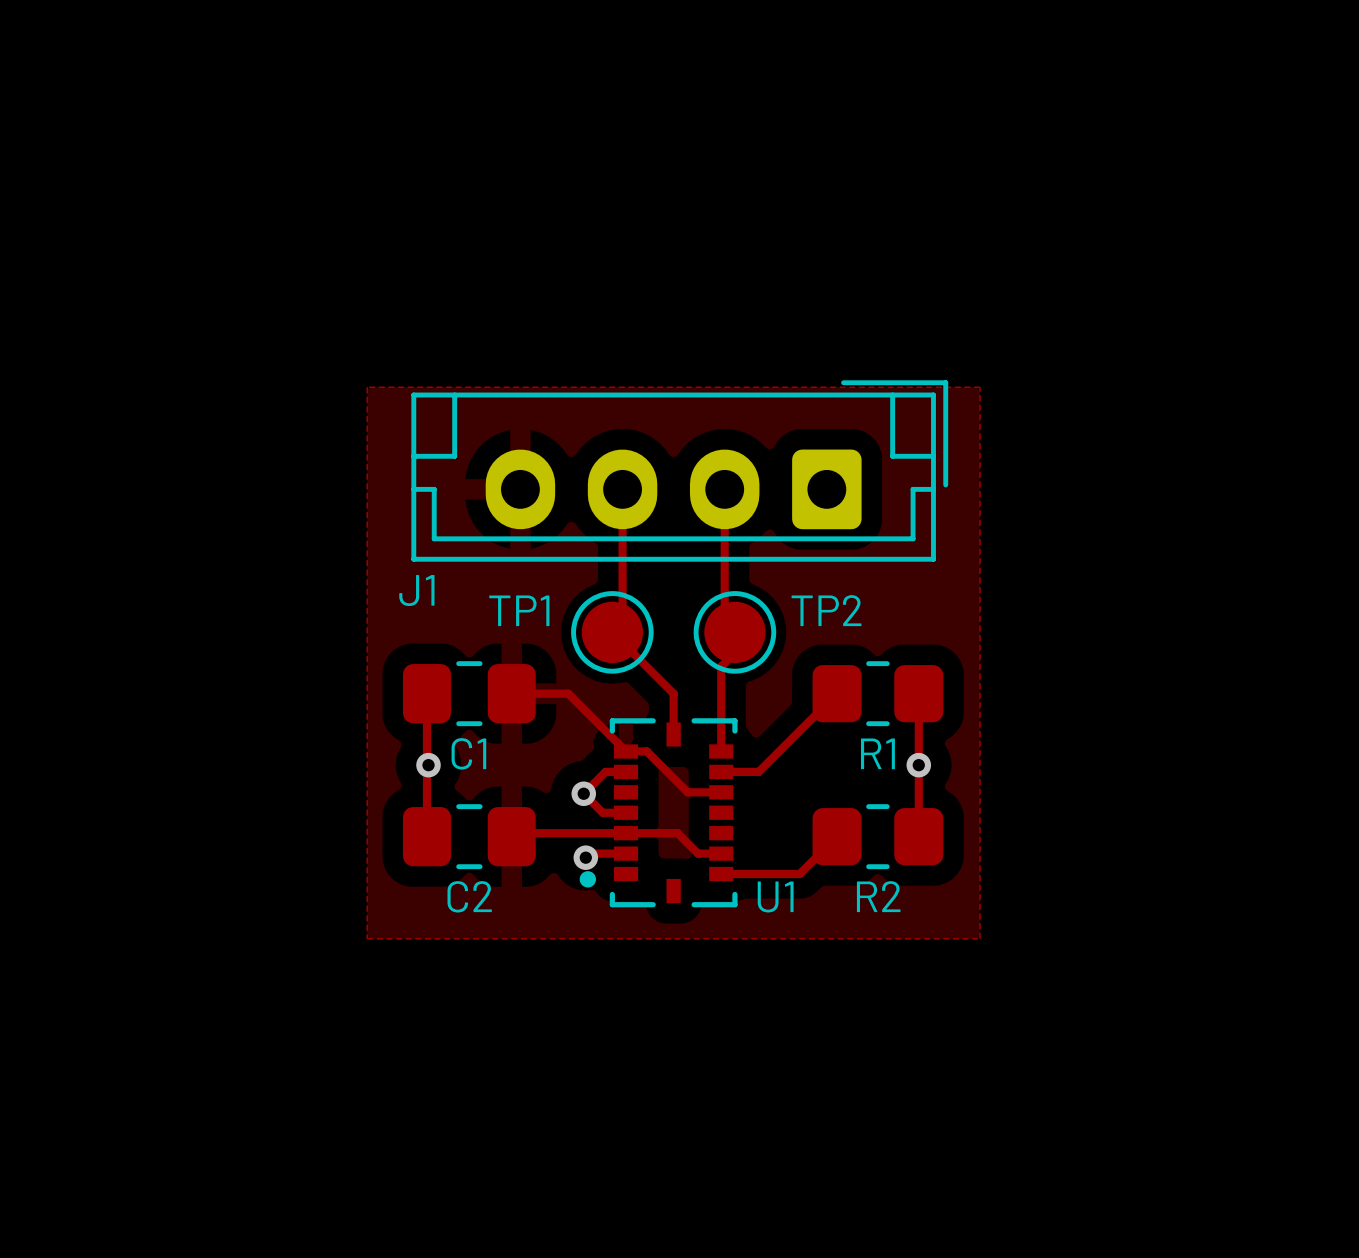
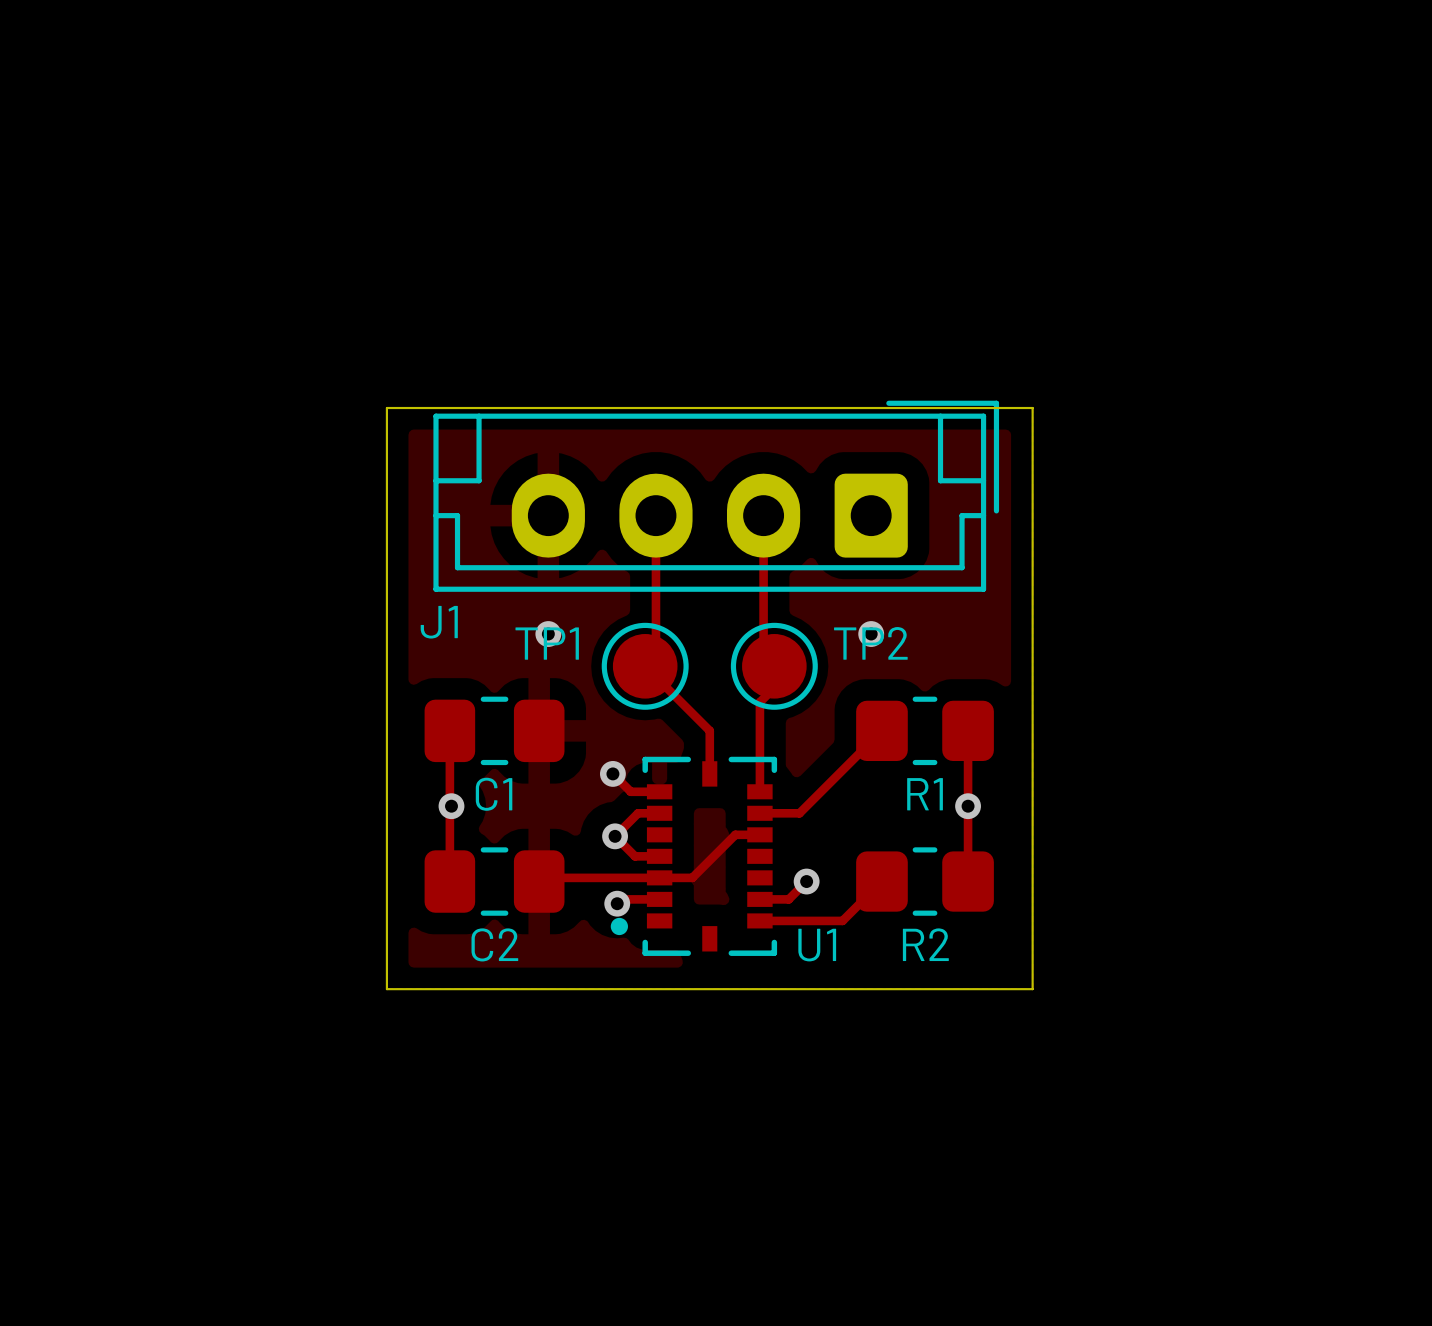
board edge: none -> (386, 408) (1032, 408) (1032, 989) (386, 989) (386, 408)
via: none -> (548, 634)
via: none -> (871, 634)
track: (511, 693) (568, 693) (626, 751) (646, 751) (687, 792) (697, 792) -> none
track: none -> (612, 773) (630, 791) (659, 791)
via: none -> (612, 773)
track: (657, 833) (677, 833) (697, 853) (721, 853) -> (692, 877) (735, 834)
track: none -> (806, 881) (788, 899) (759, 899)
via: none -> (806, 881)

